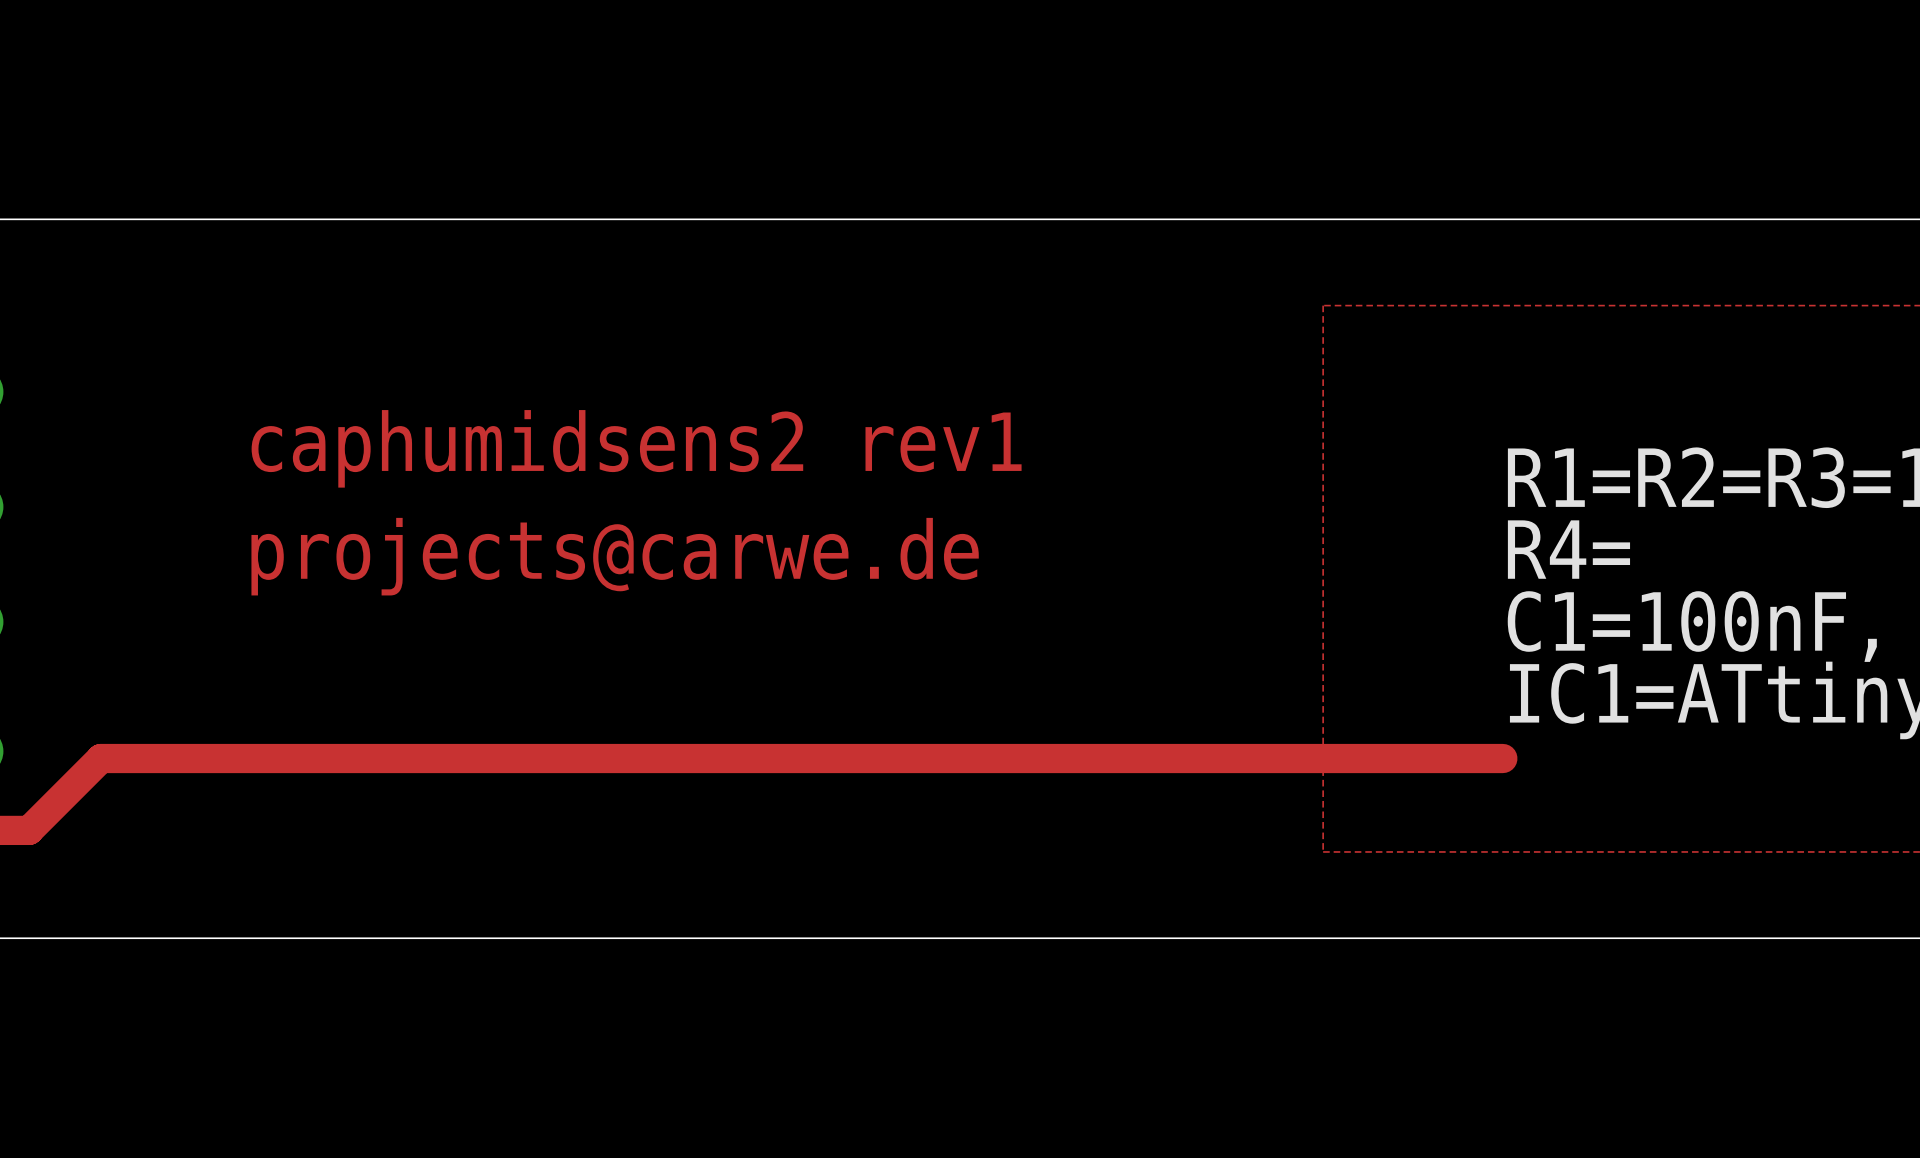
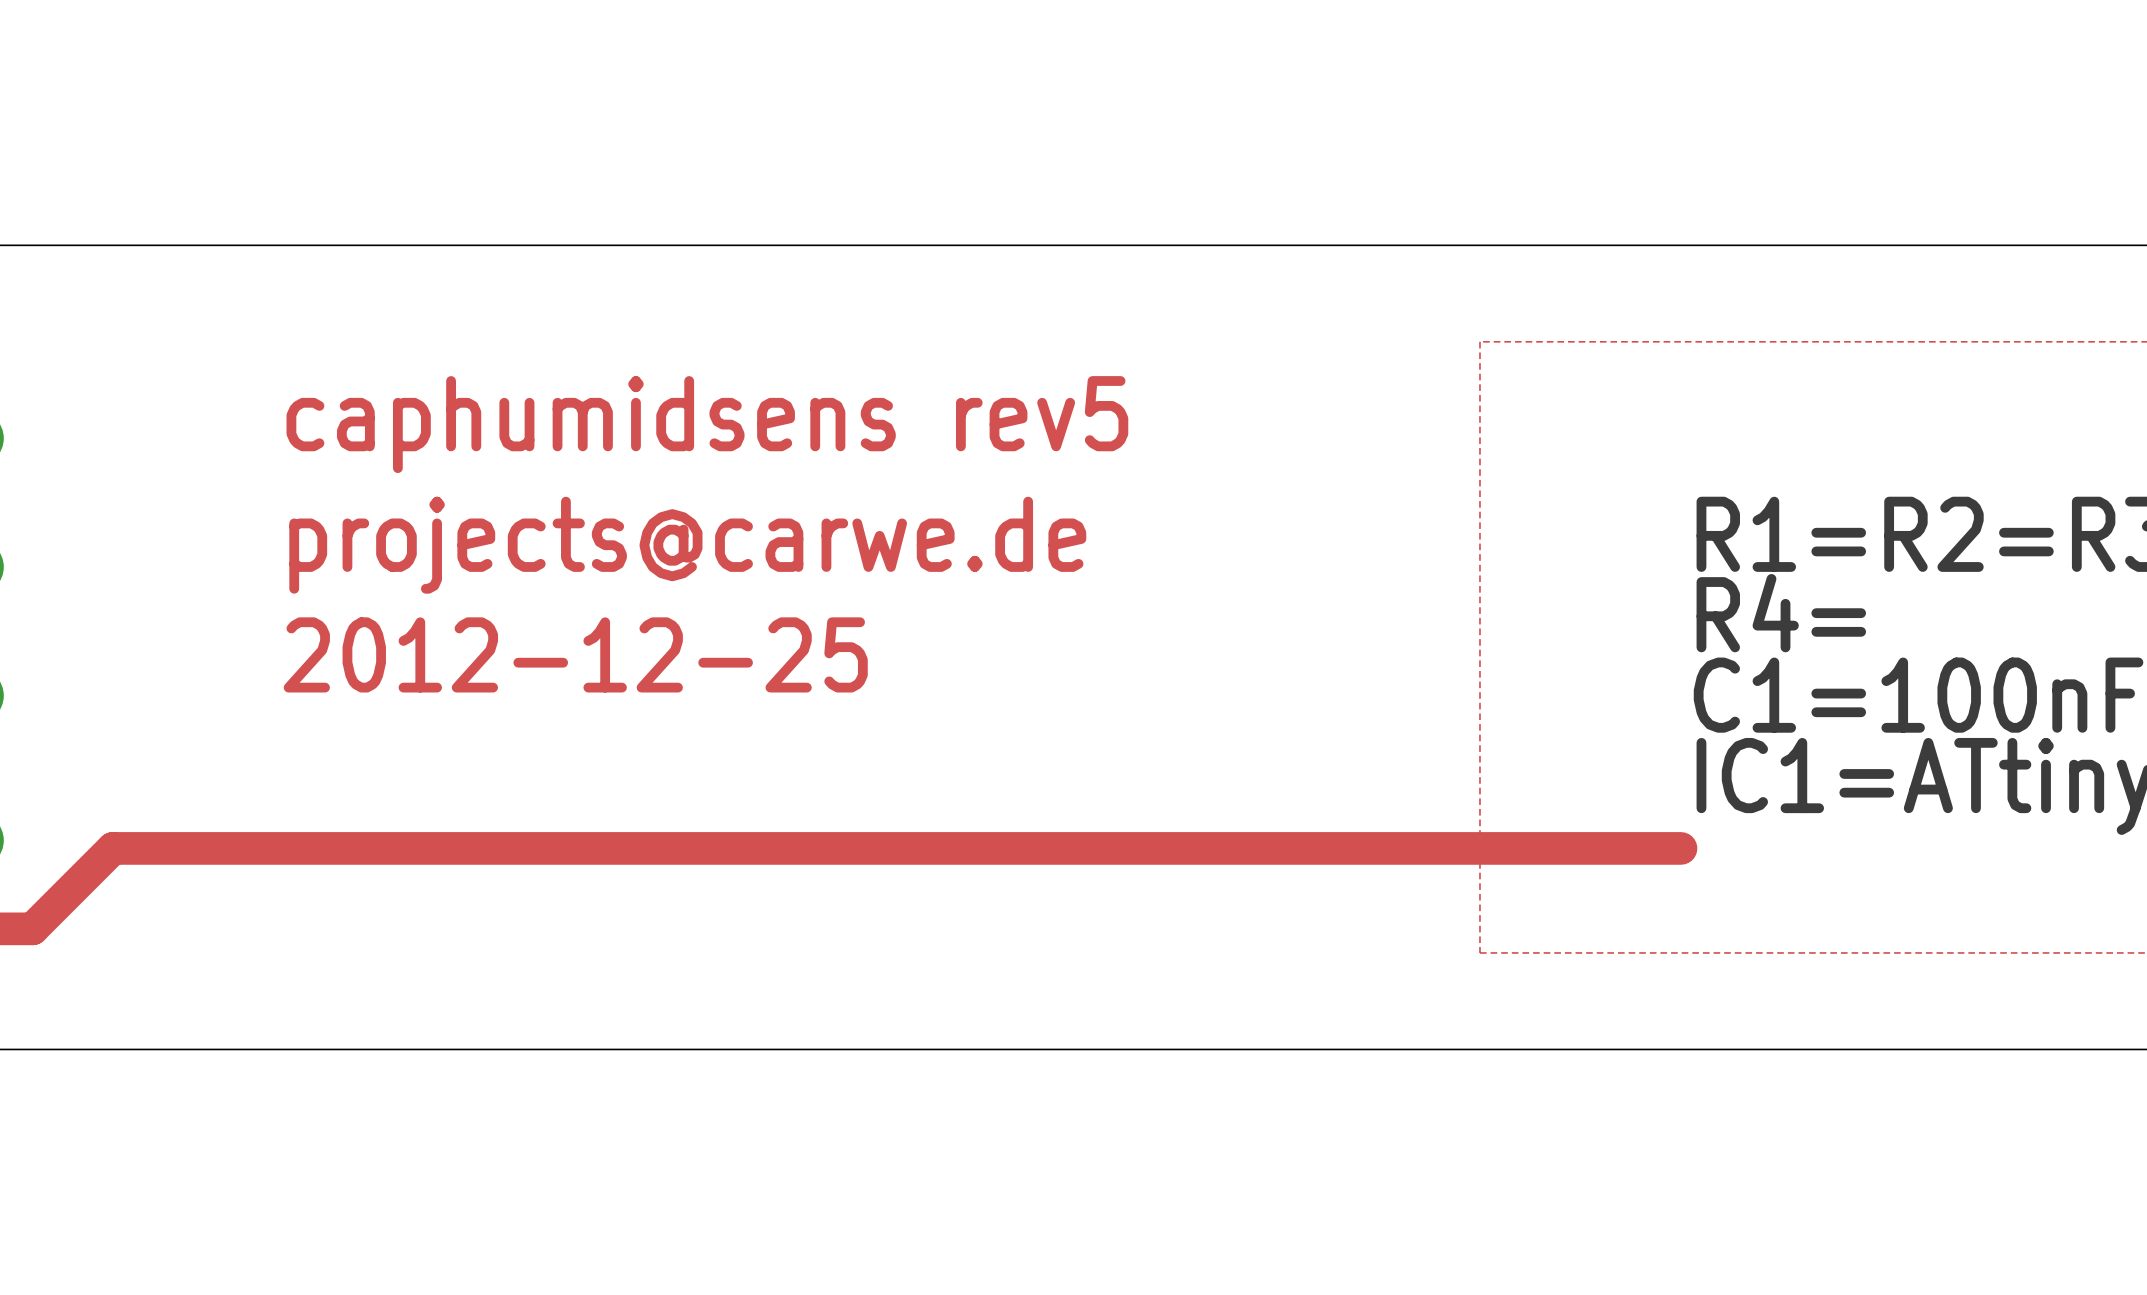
text: caphumidsens2 rev1 (636, 448) -> caphumidsens rev5 (707, 424)
text position: projects@carwe.de (615, 556) -> projects@carwe.de (687, 545)
text: none -> 2012-12-25 (575, 654)

